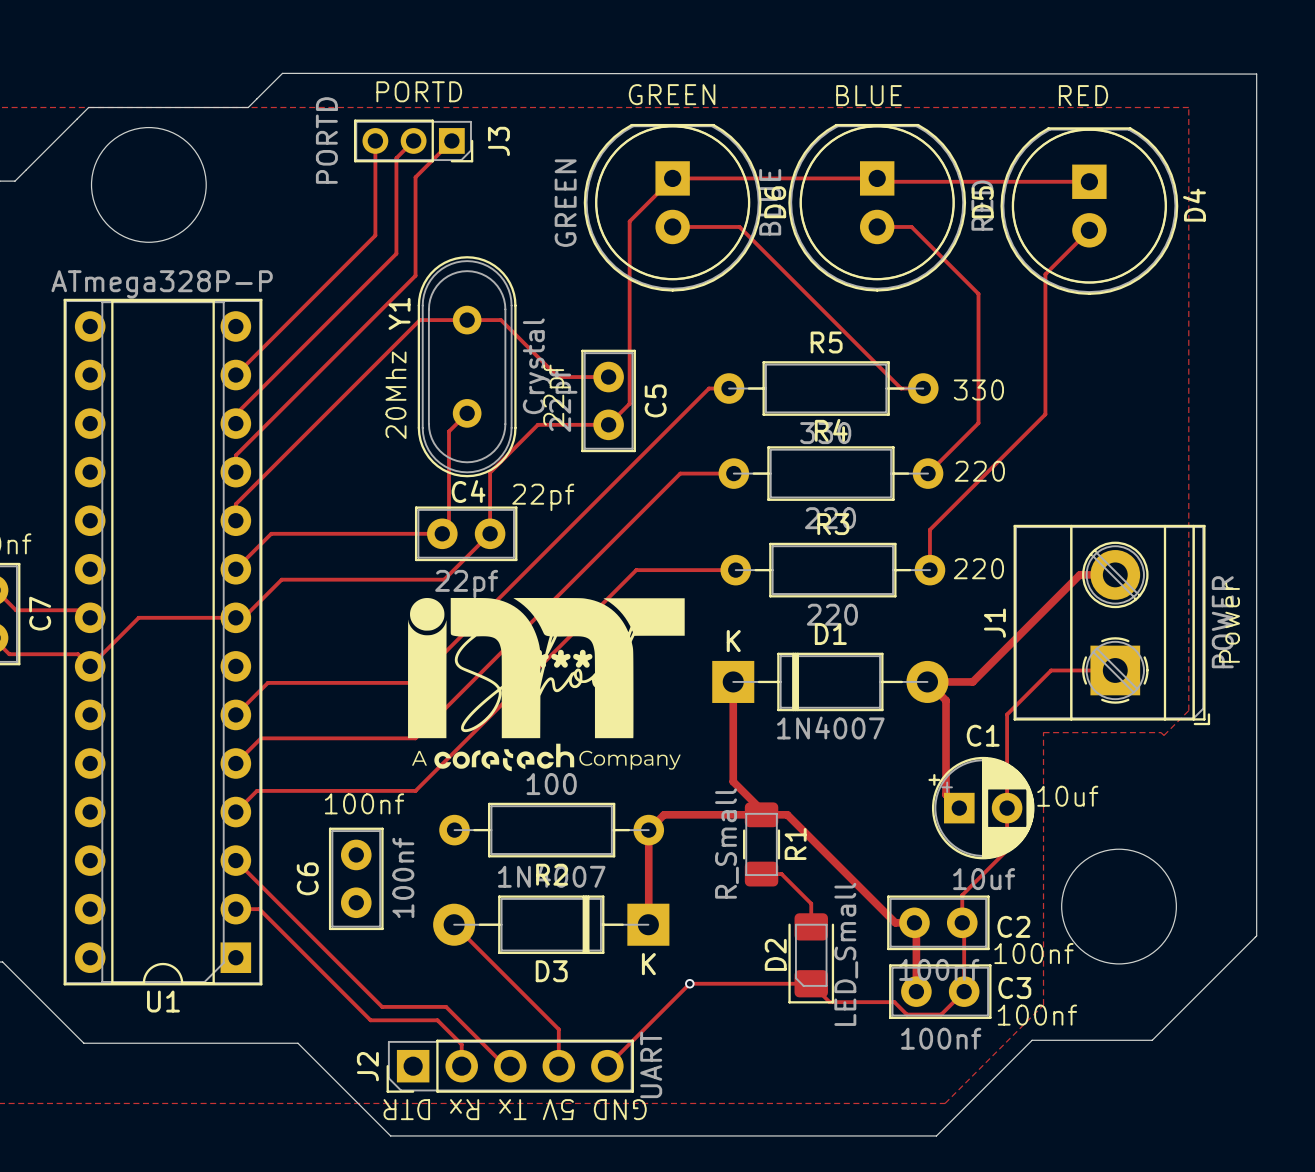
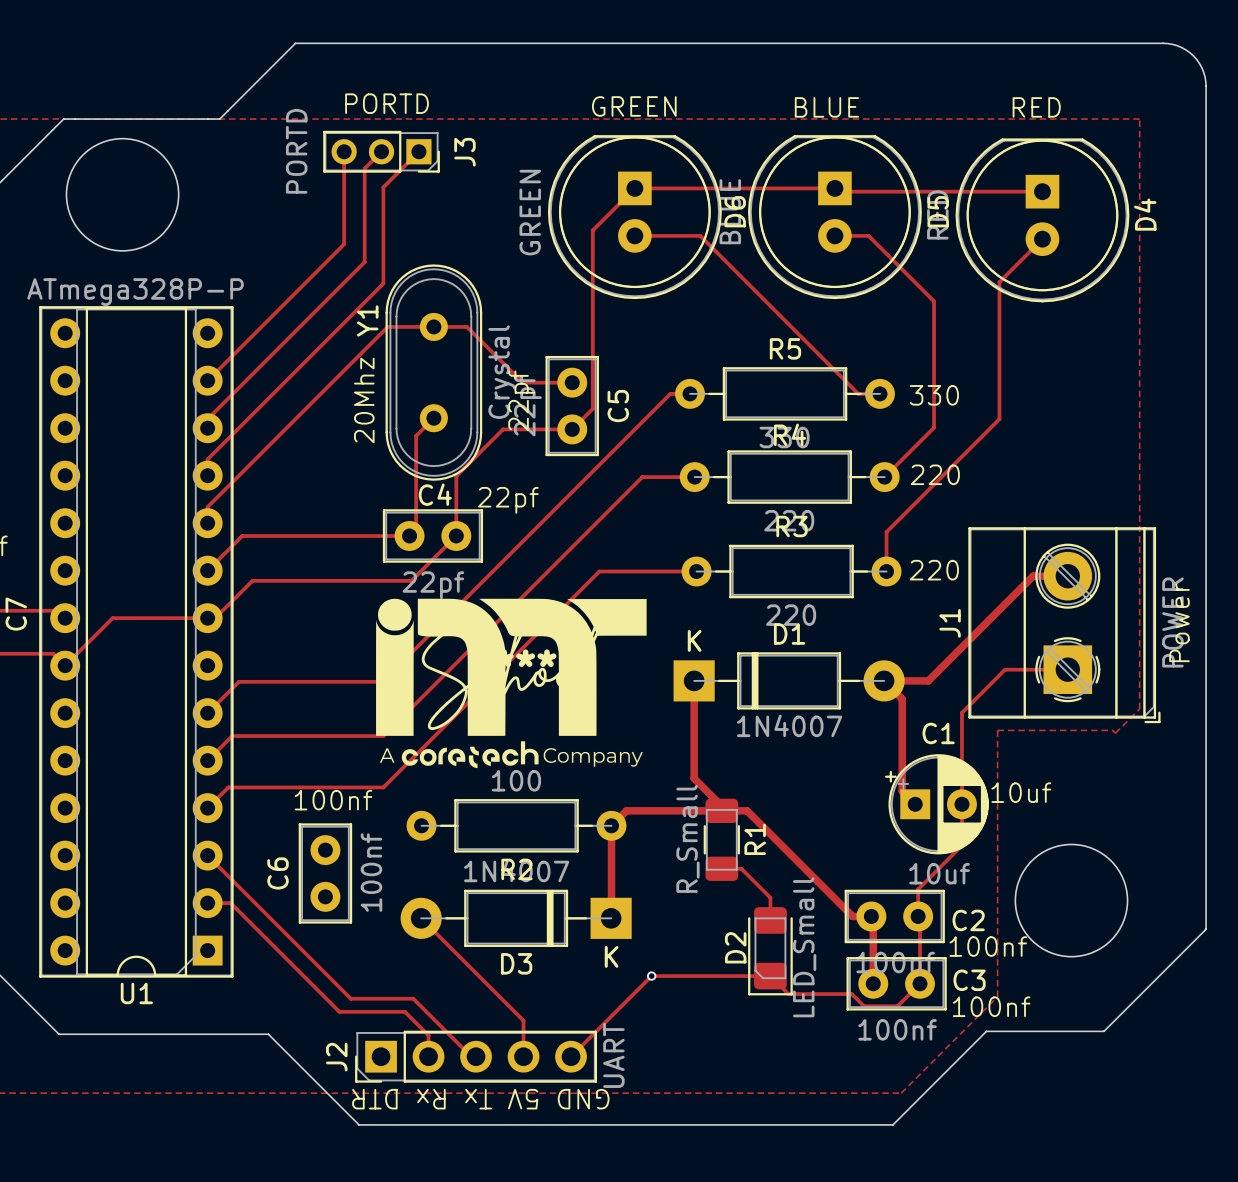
board edge: (1256, 74) (282, 73) (256, 99) -> (1206, 86) (1203, 72) (1193, 55) (1177, 45) (1163, 43) (295, 43) (228, 110)

